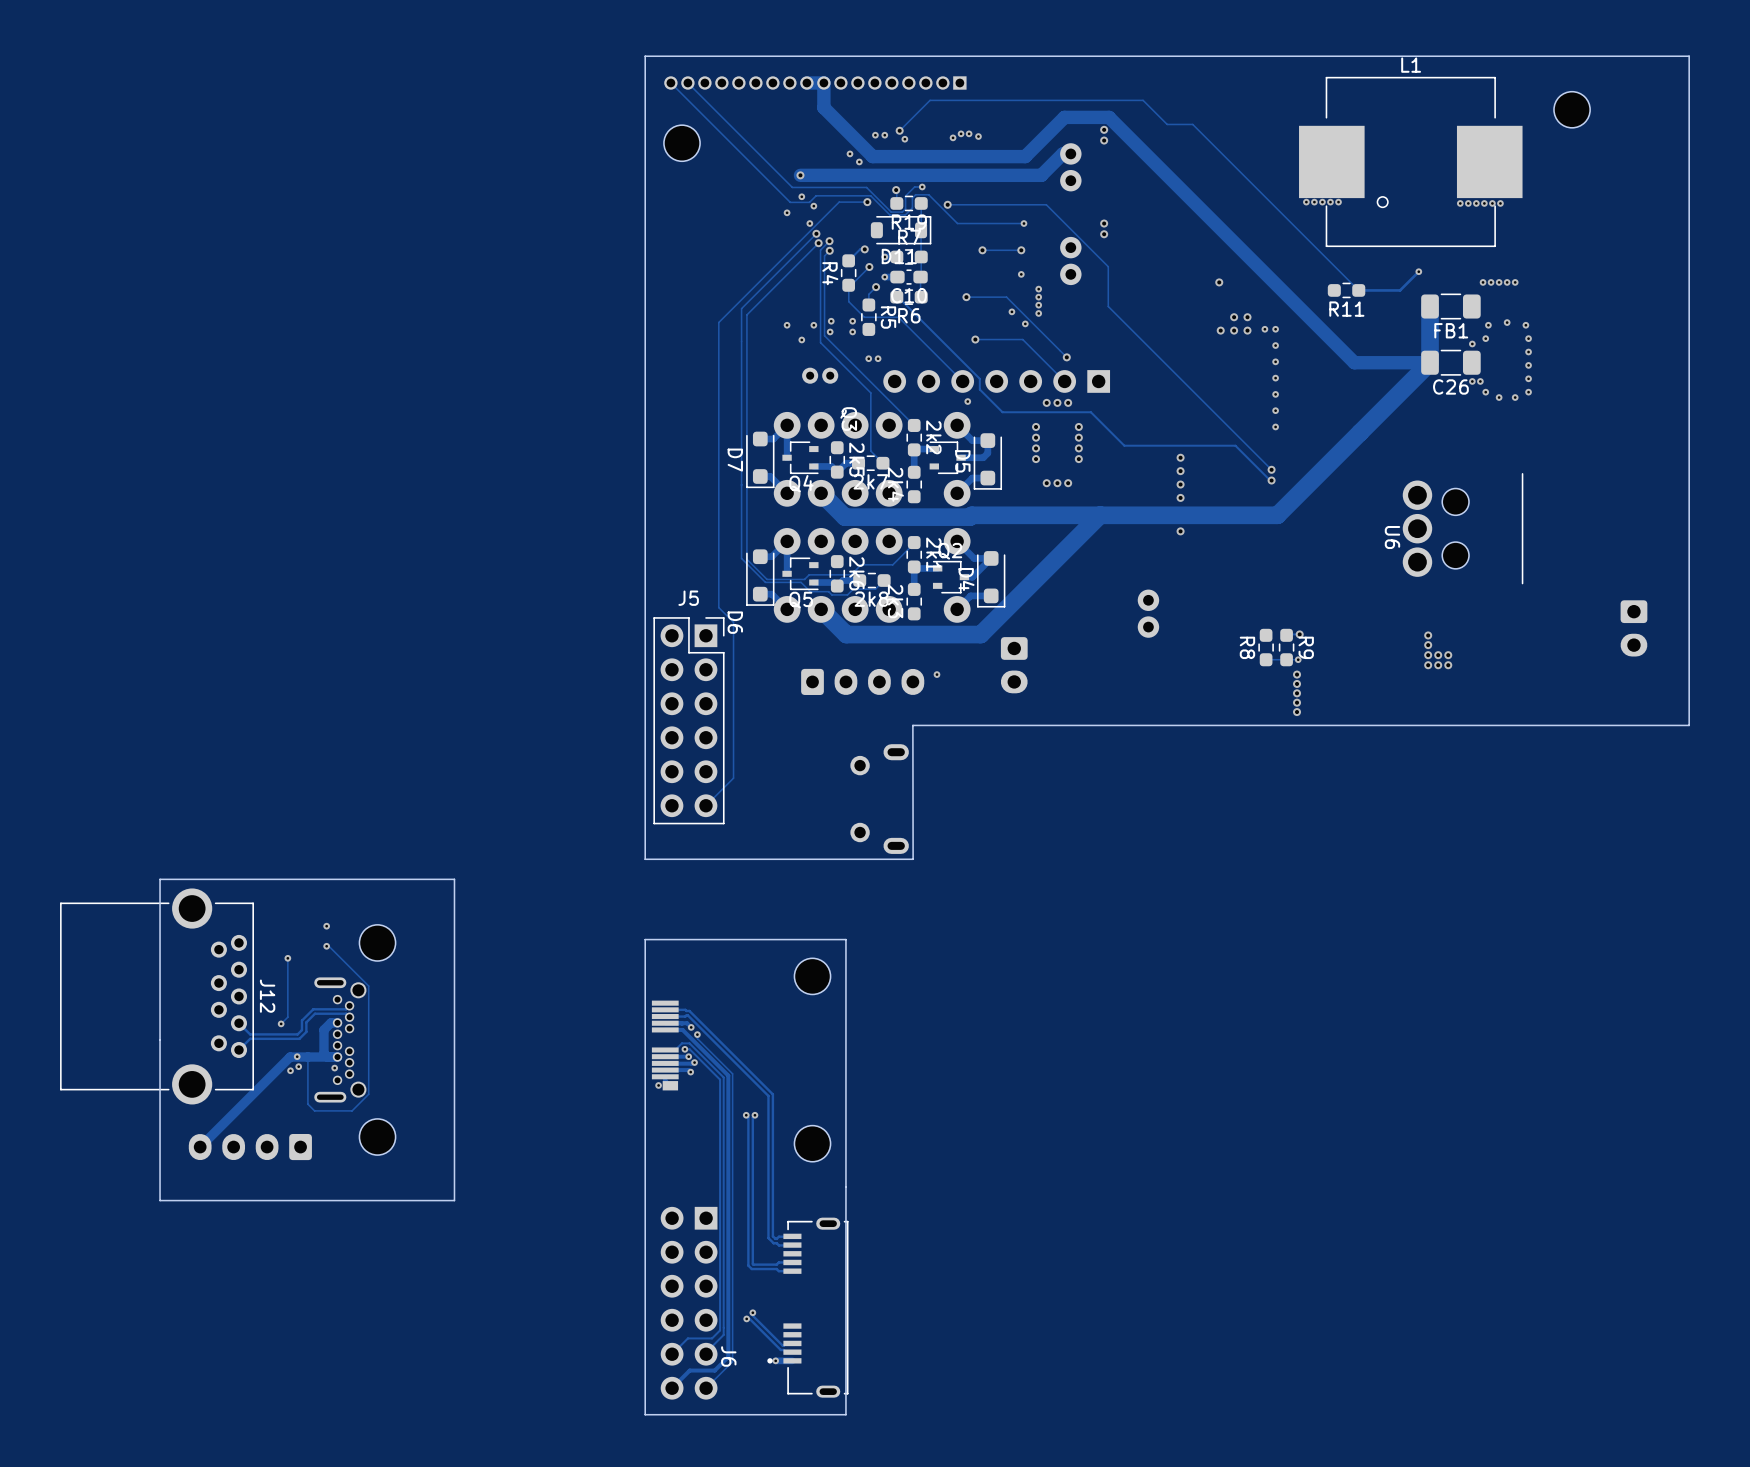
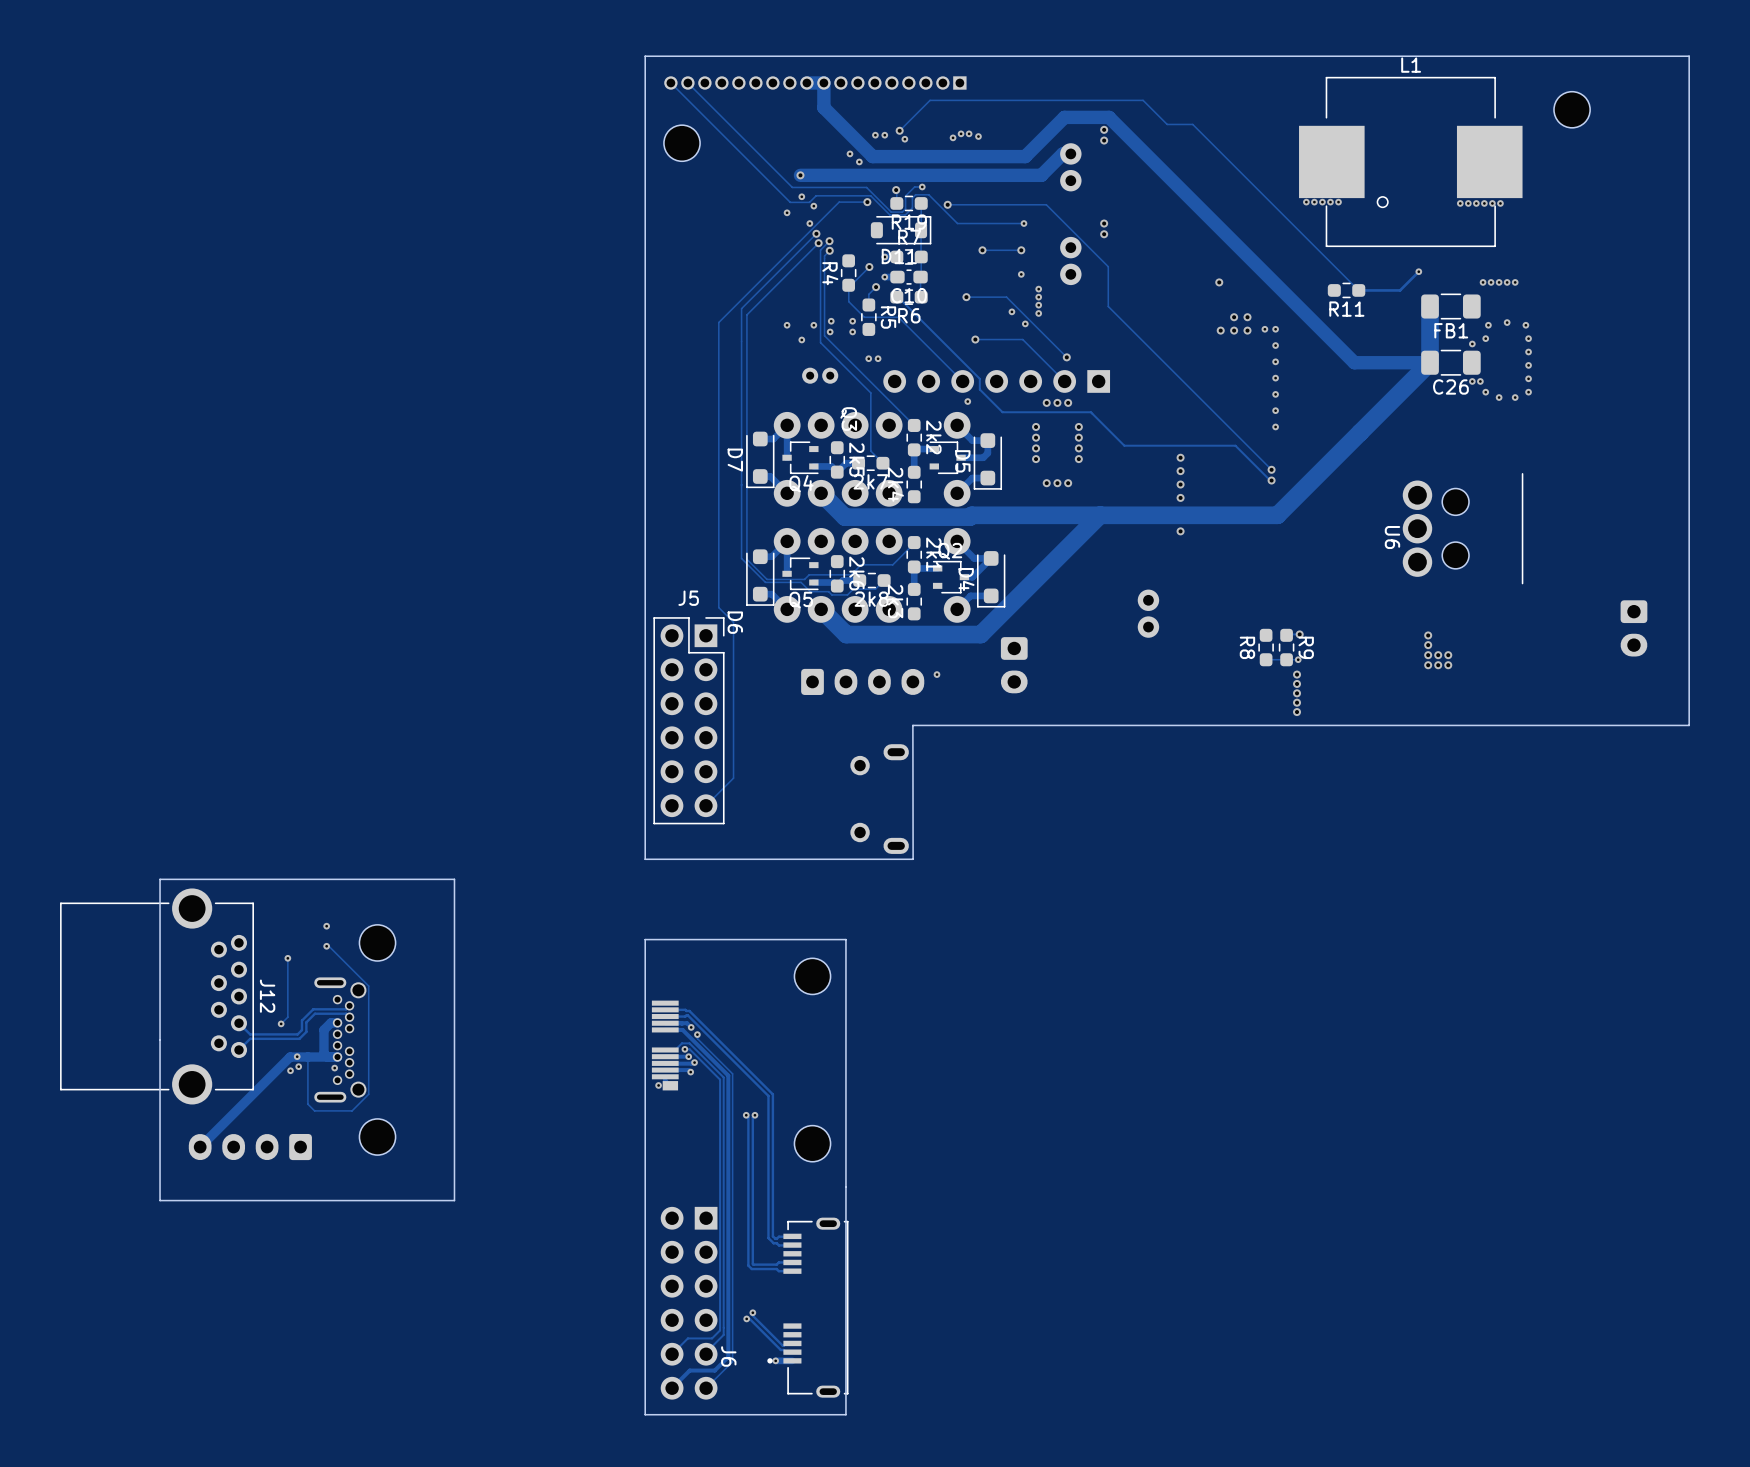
track: (864, 249) (860, 249) (848, 260) -> none
via: (864, 249) -> none

